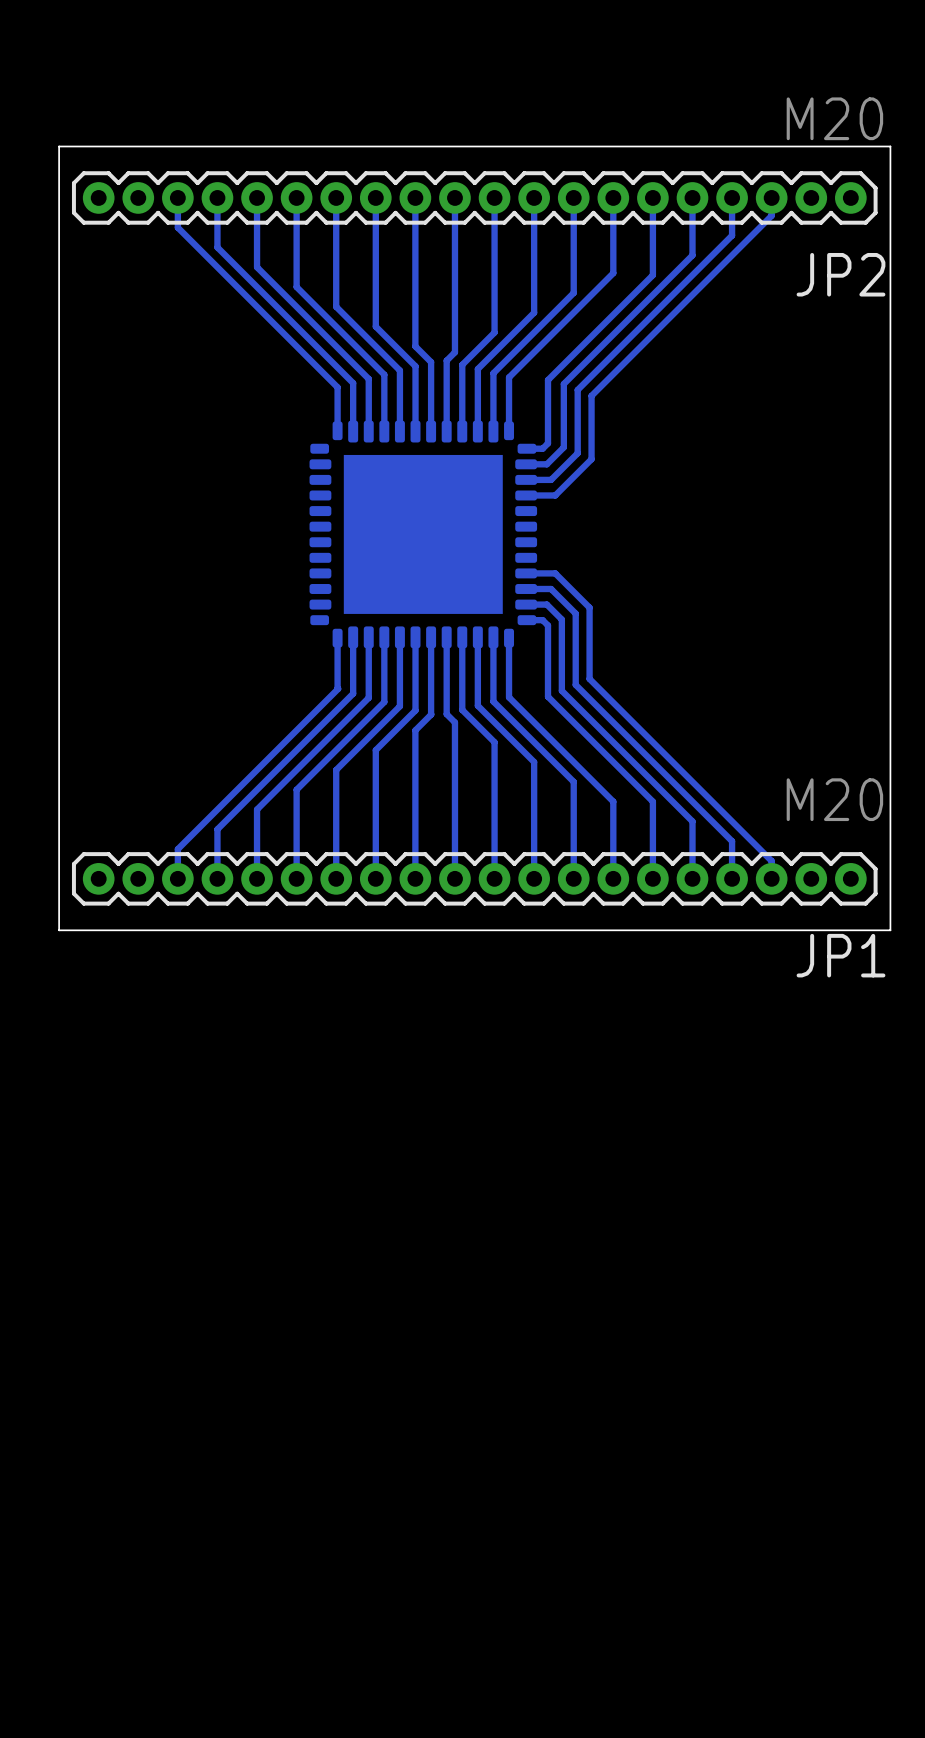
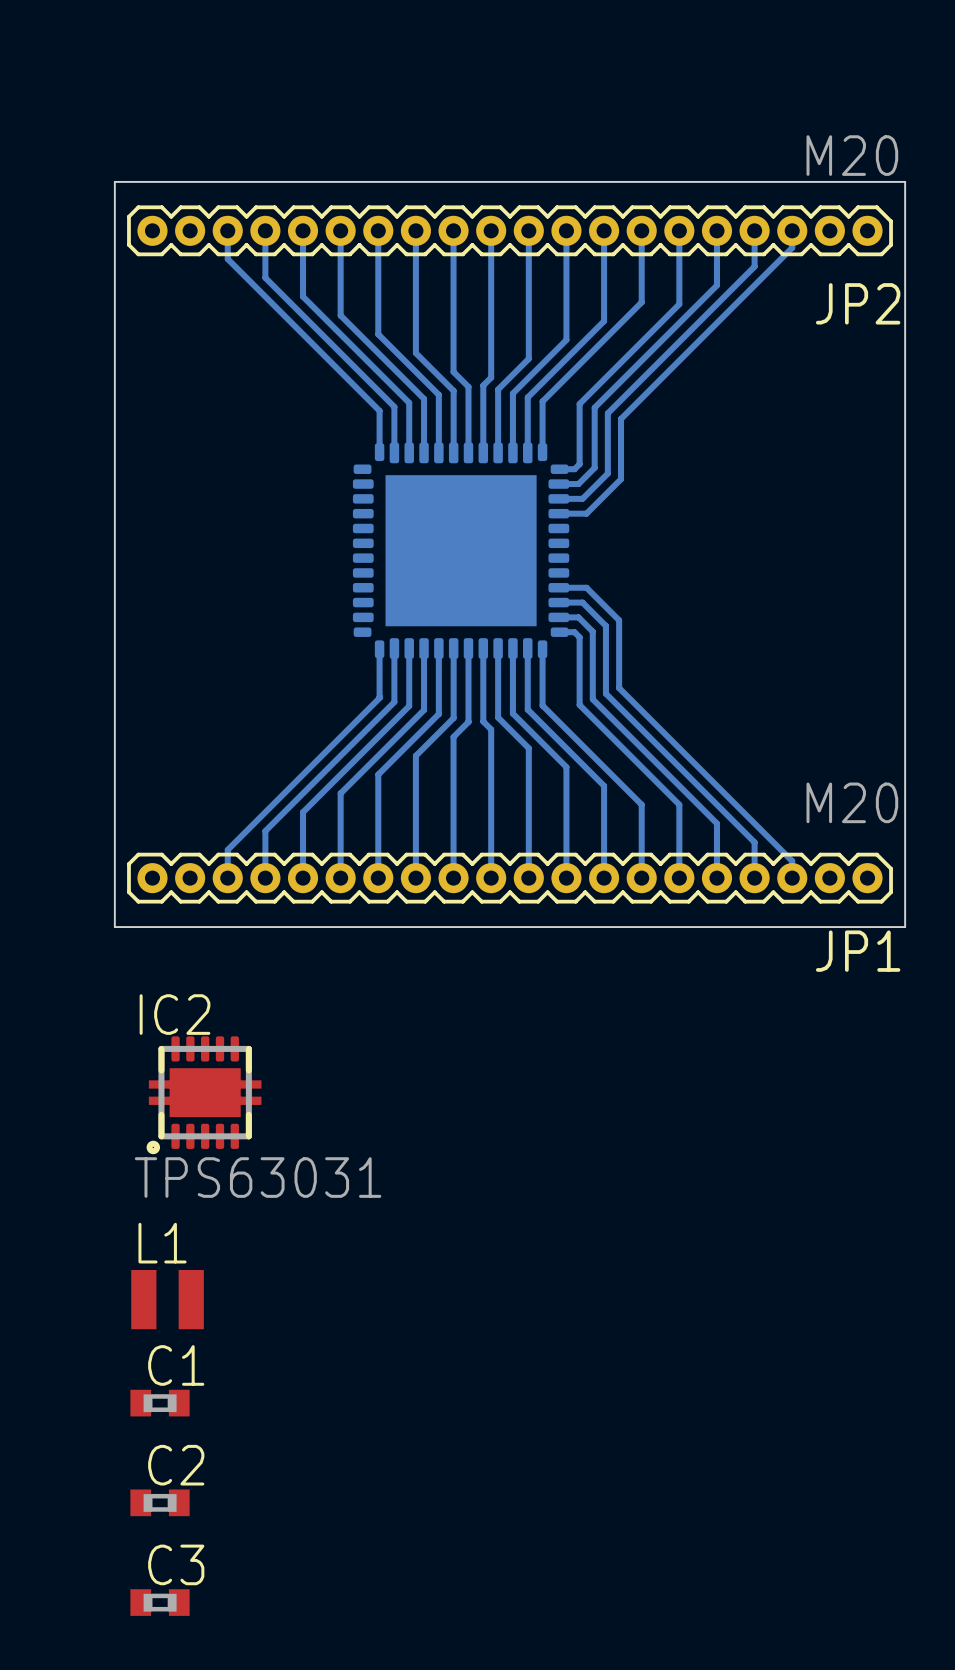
IC2: none -> TPS63031 (204, 1095)
L1: none -> (167, 1299)
C1: none -> (160, 1403)
C2: none -> (160, 1502)
C3: none -> (160, 1602)

